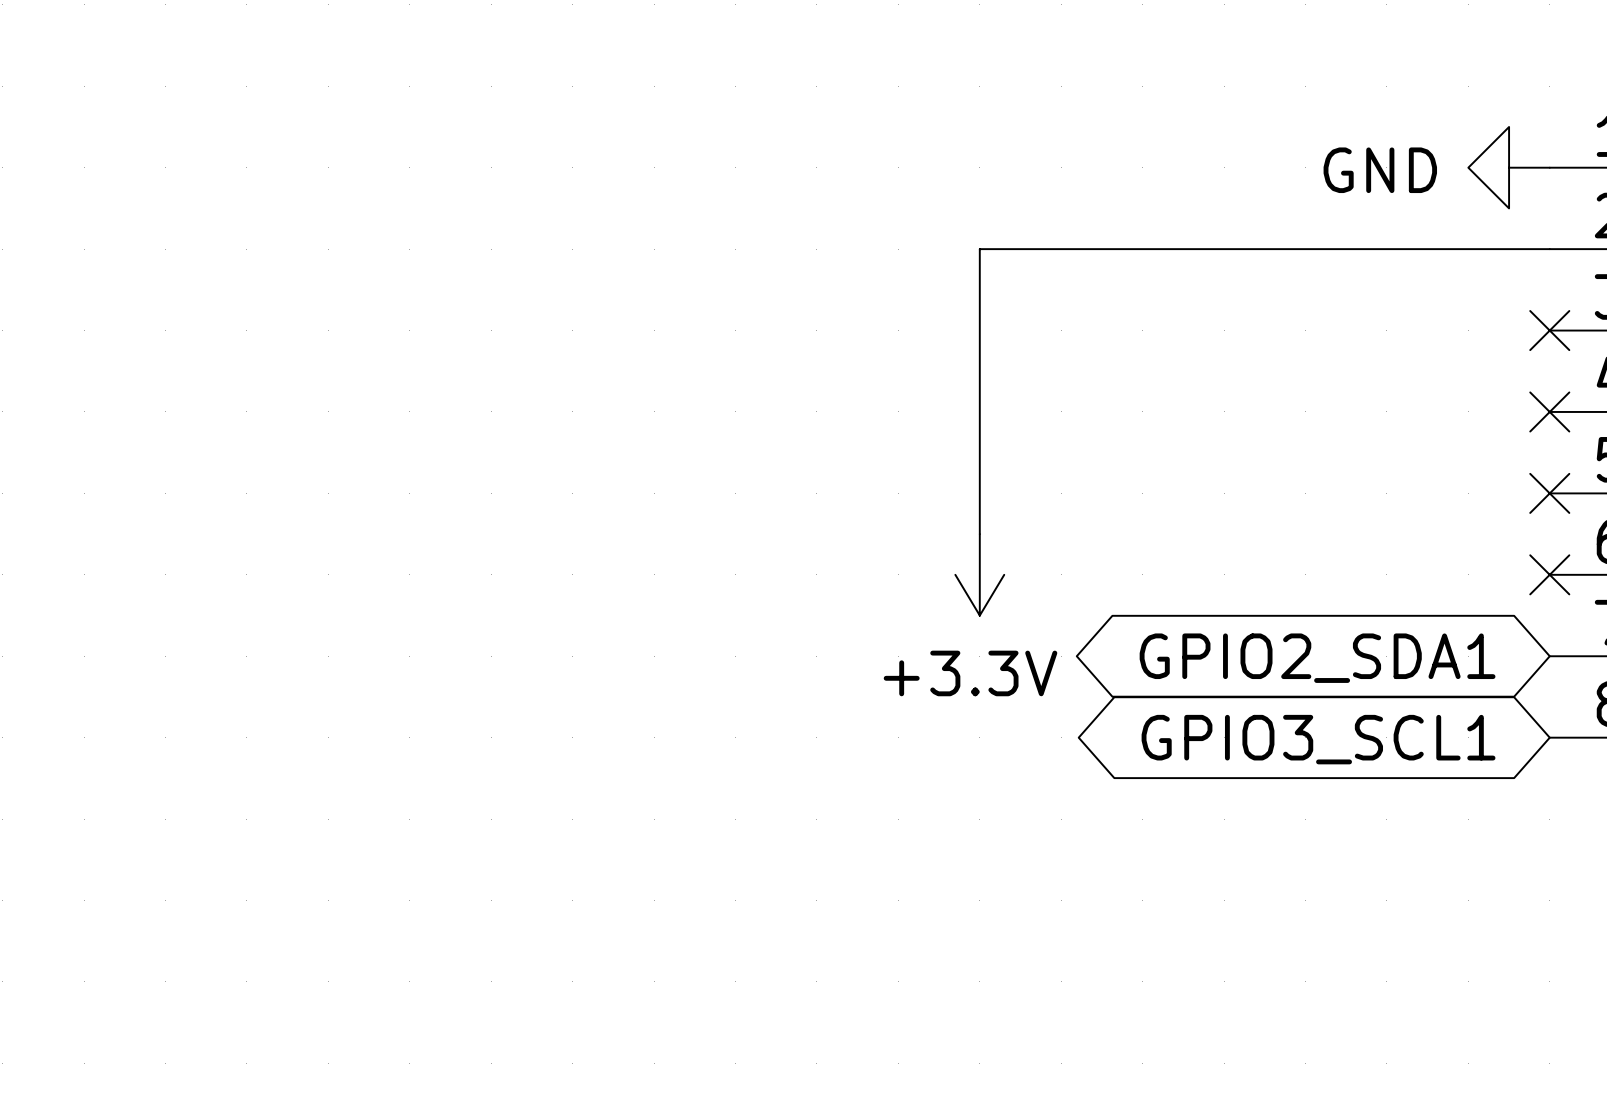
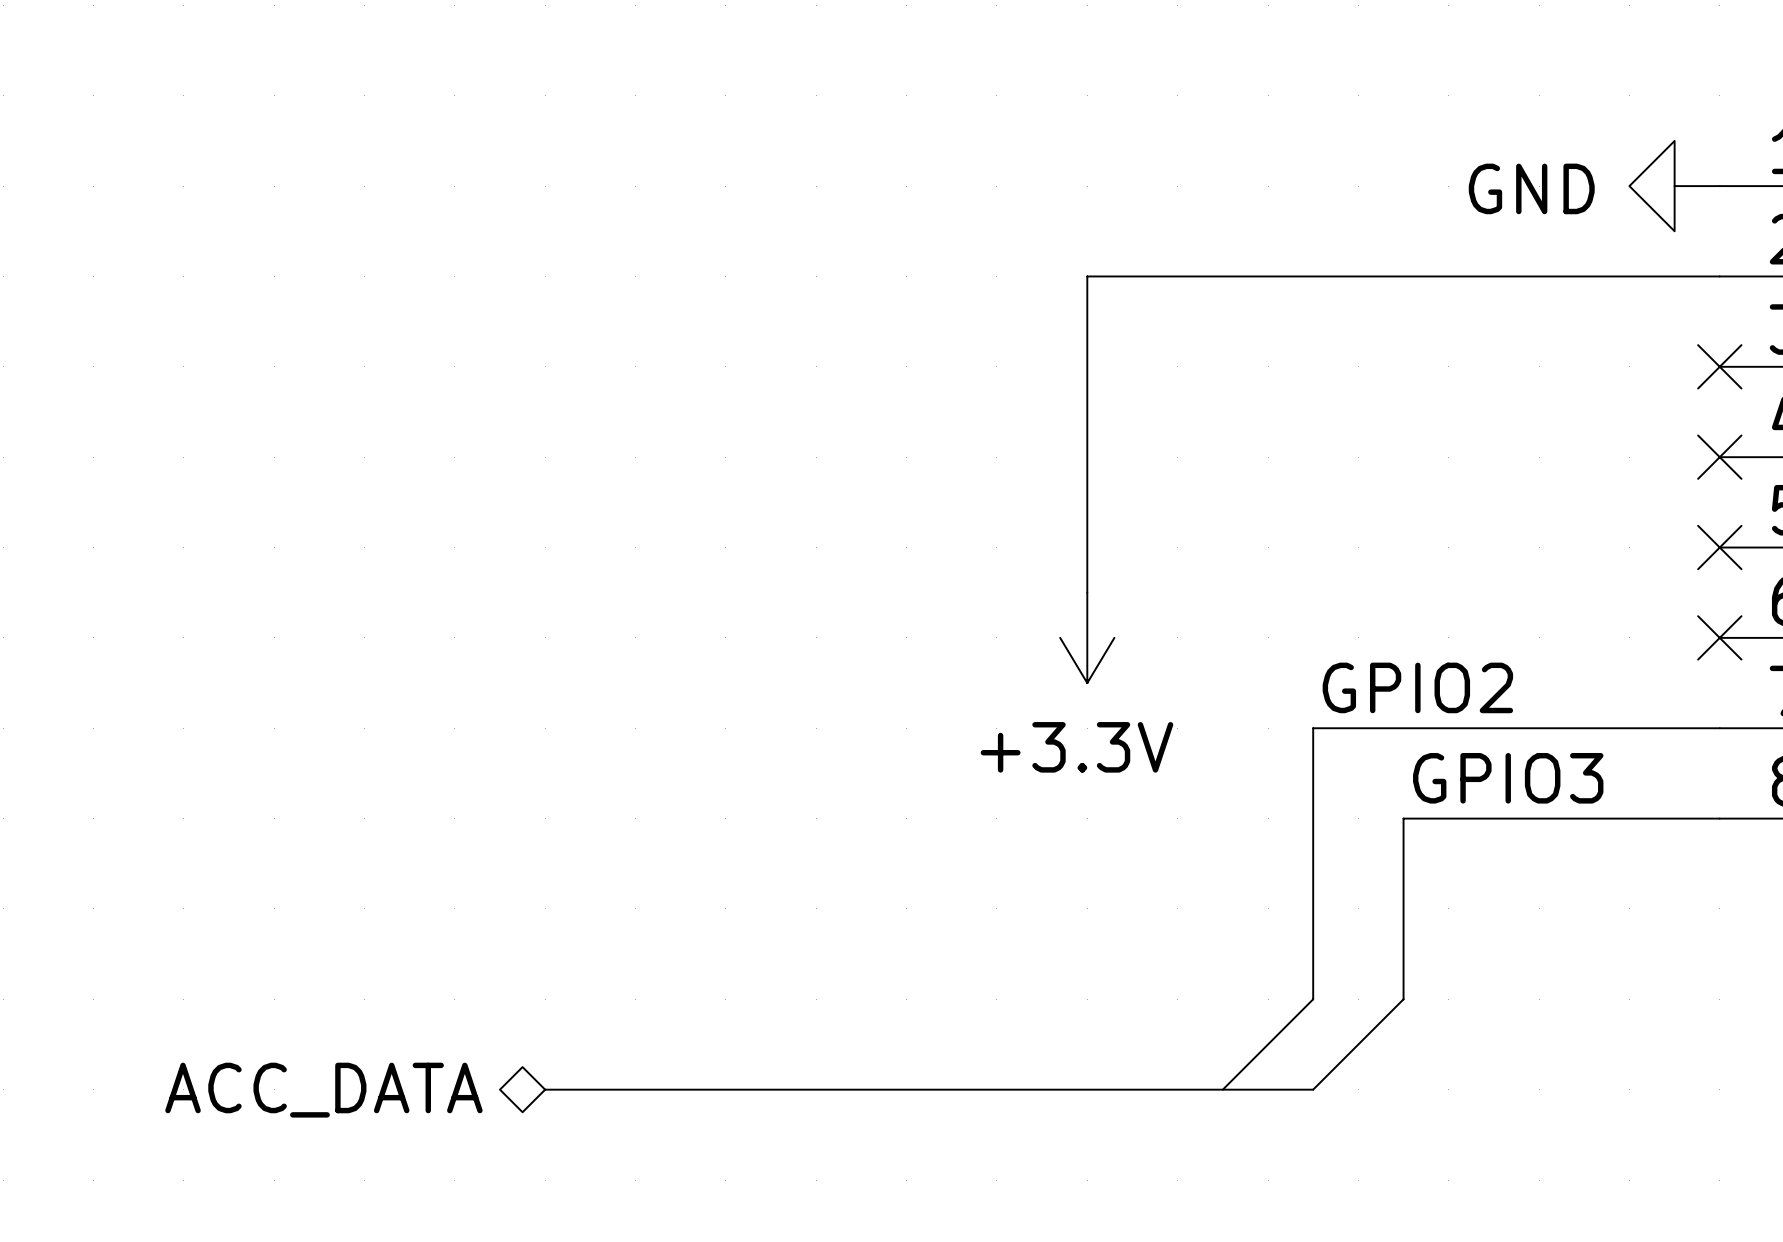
label: none -> GPIO2 (1417, 687)
wire: none -> (1719, 728) (1313, 728) (1313, 999) (1222, 1089)
global label: GPIO2_SDA1 (1317, 658) -> none
label: none -> GPIO3 (1508, 778)
wire: none -> (1719, 818) (1403, 818) (1403, 999) (1313, 1089)
global label: GPIO3_SCL1 (1318, 739) -> none
bus: none -> (545, 1089) (1313, 1089)
hierarchical label: none -> ACC_DATA (323, 1090)

